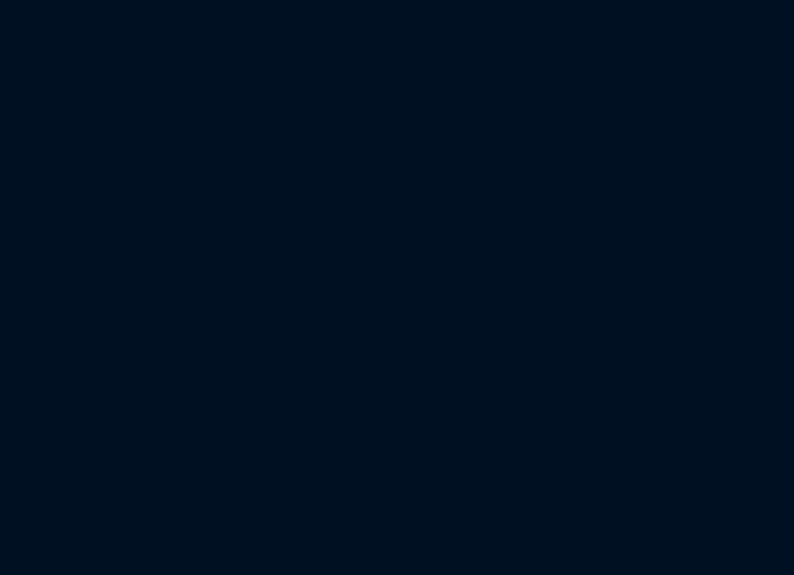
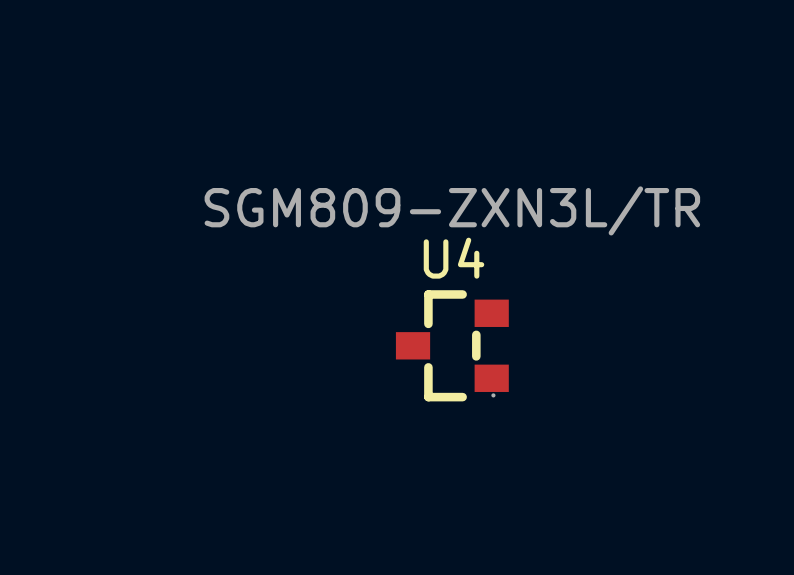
U4: none -> SGM809-ZXN3L/TR (452, 345)

